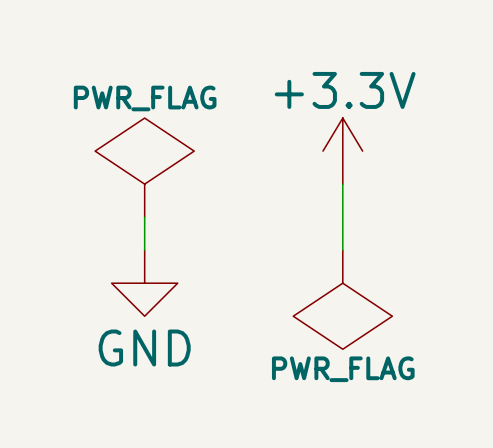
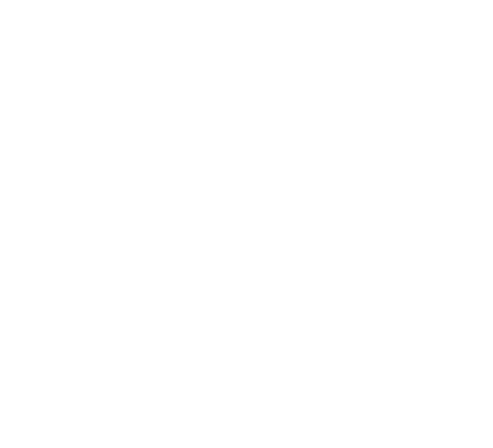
power symbol: +3.3V (342, 151) -> none
power symbol: PWR_FLAG (144, 167) -> none
wire: (342, 184) (342, 250) -> none
wire: (144, 217) (144, 250) -> none
power symbol: GND (144, 283) -> none
power symbol: PWR_FLAG (342, 299) -> none

